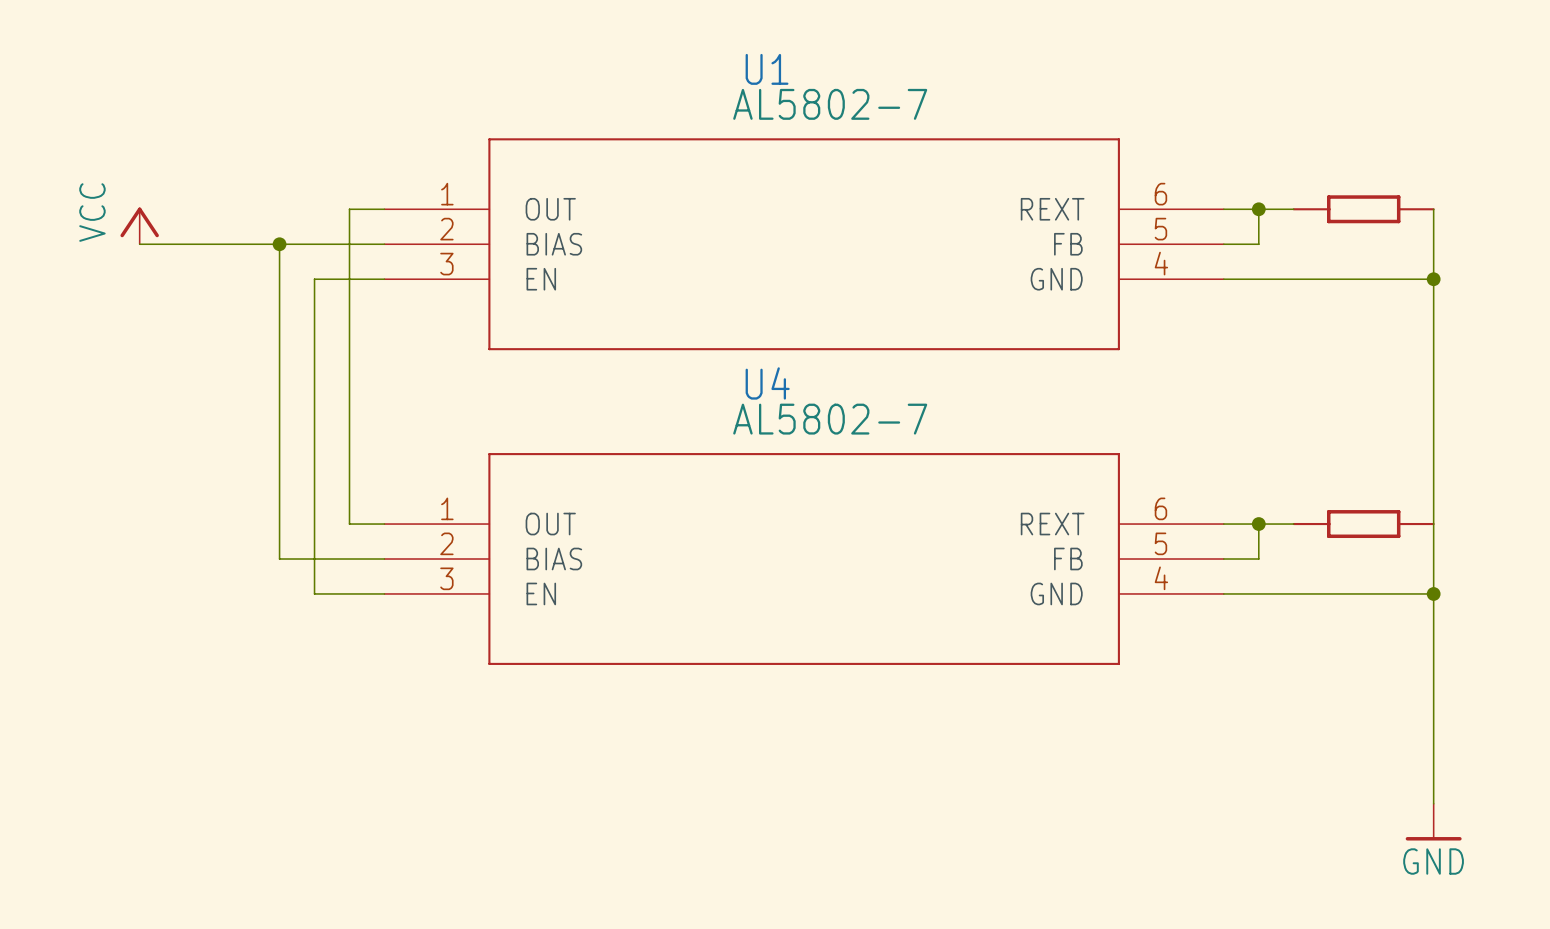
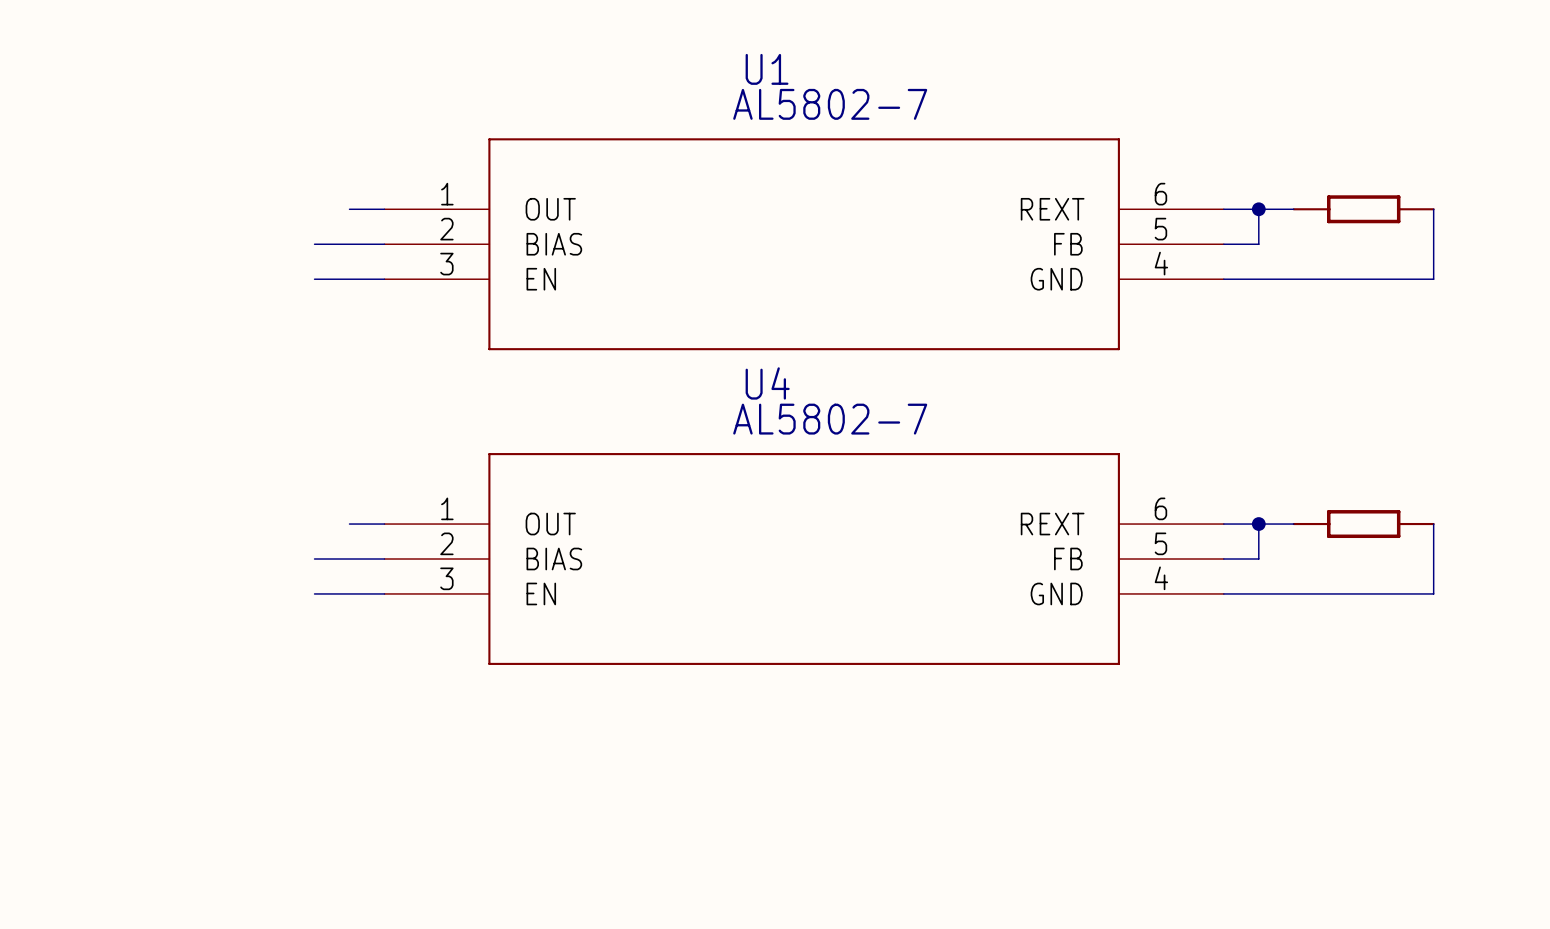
wire: (349, 209) (349, 524) -> none
power symbol: VCC (139, 225) -> none
wire: (139, 244) (314, 244) -> none
wire: (279, 244) (279, 559) (314, 559) -> none
junction: (279, 244) -> none
wire: (314, 279) (314, 593) -> none
wire: (1433, 279) (1433, 524) -> none
junction: (1433, 279) -> none
wire: (1433, 593) (1433, 803) -> none
junction: (1433, 593) -> none
power symbol: GND (1433, 822) -> none

